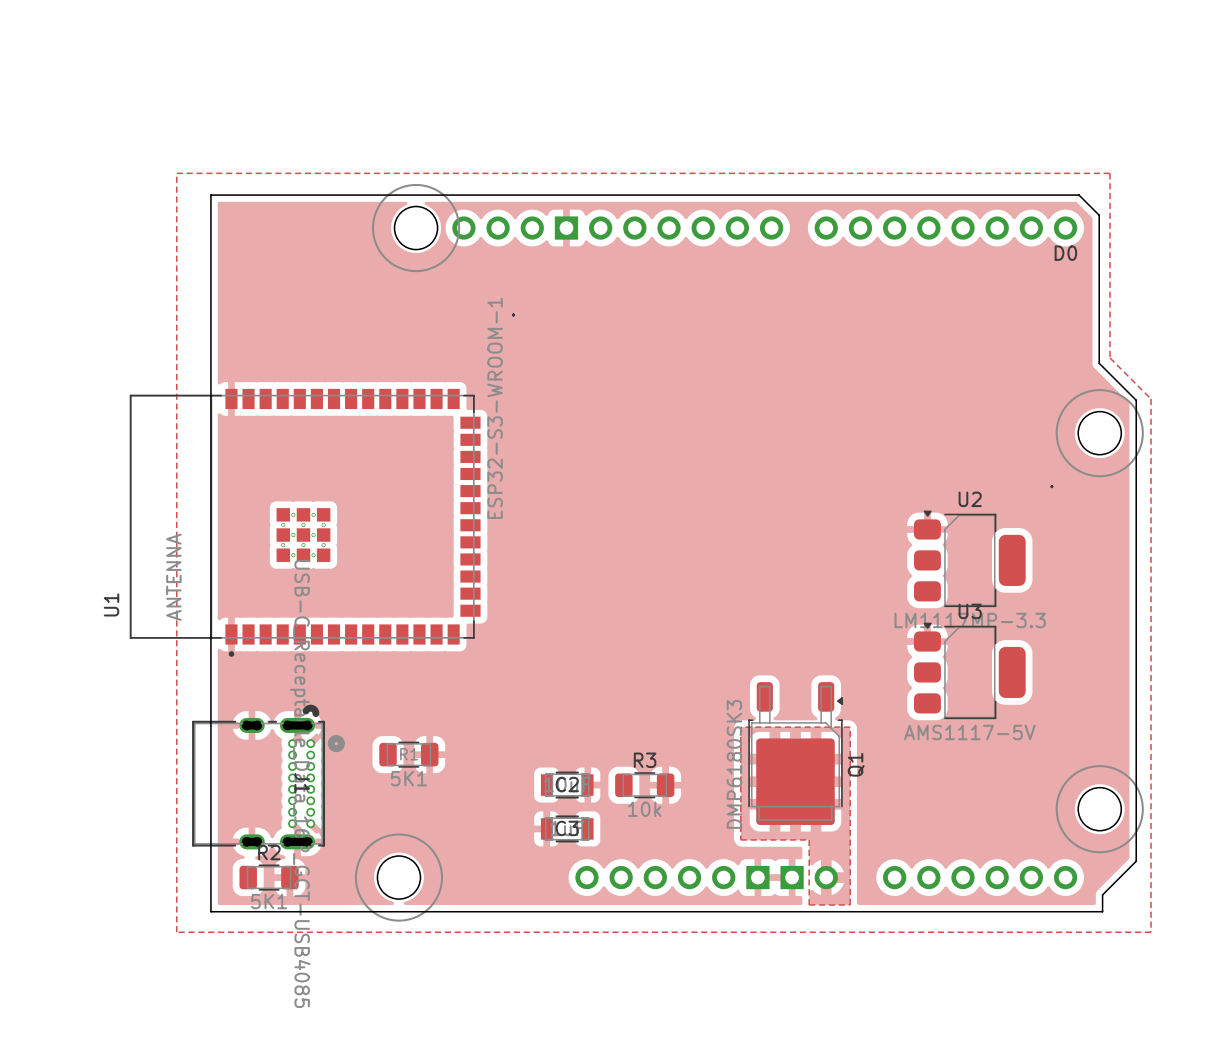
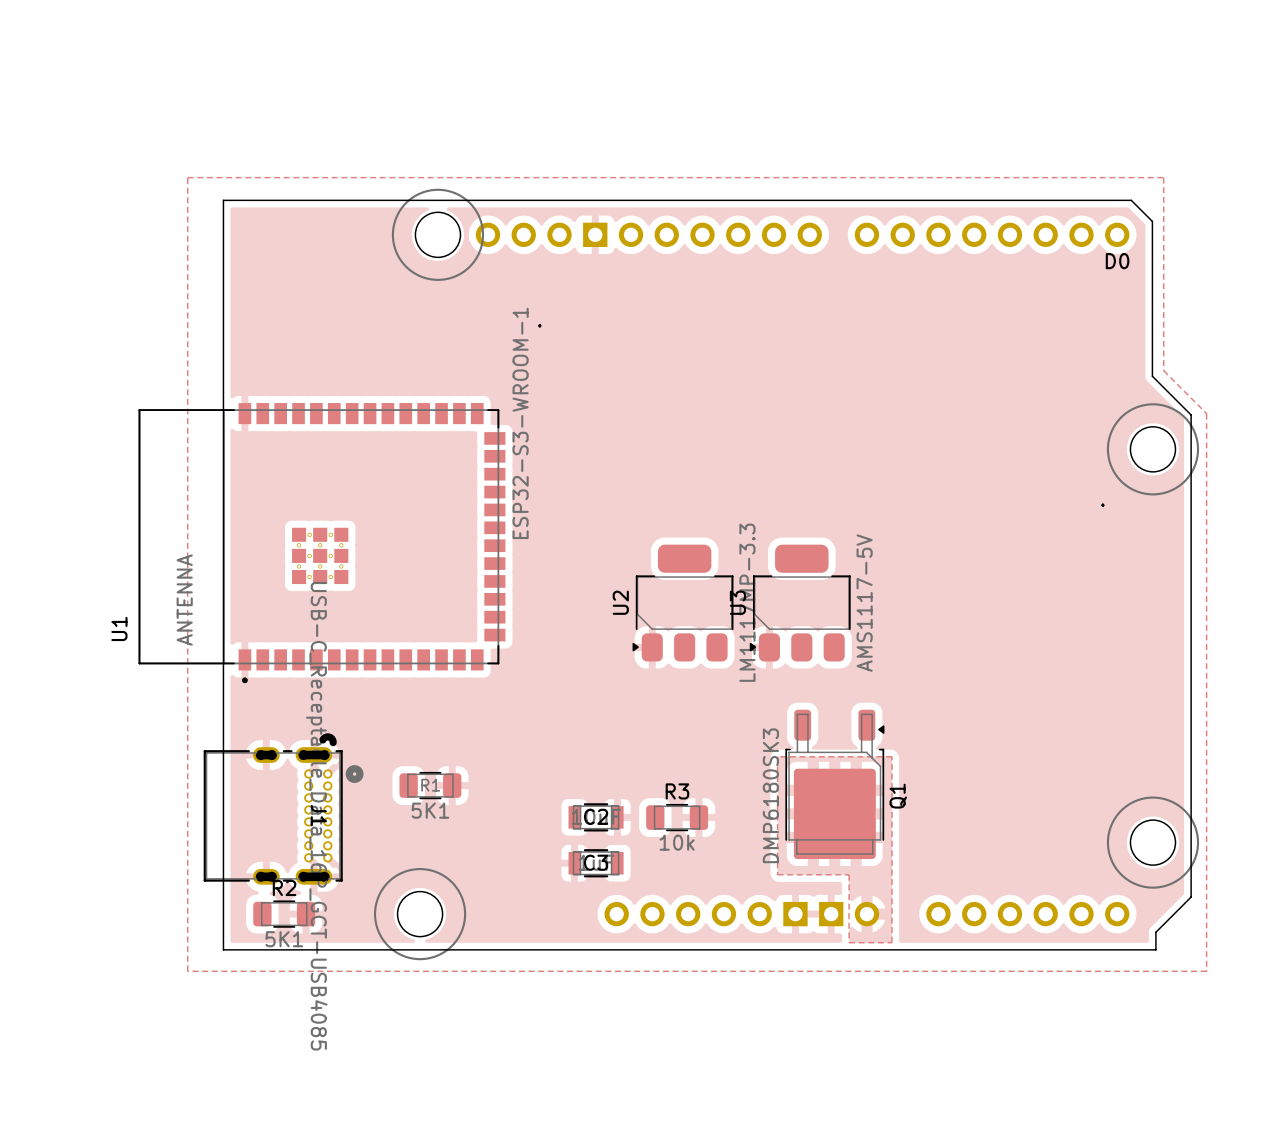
U2 rotation: 0° (969, 558) -> 90° counterclockwise (683, 603)
U2 position: (969, 558) -> (683, 603)
U3 rotation: 0° (969, 670) -> 90° counterclockwise (800, 603)
U3 position: (969, 670) -> (800, 603)

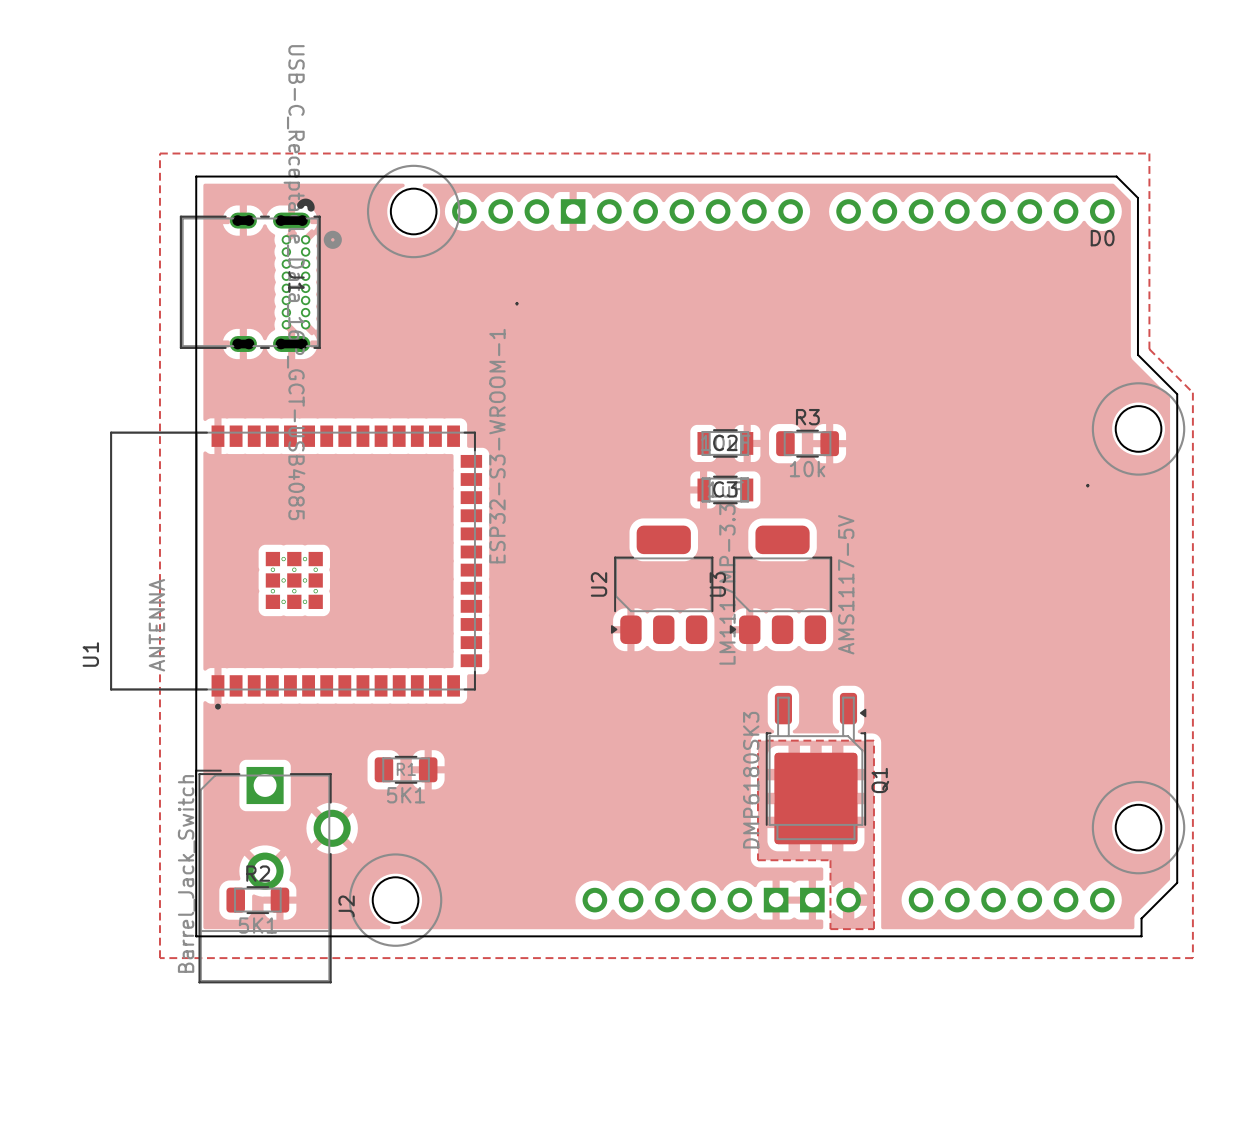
U1 position: (322, 543) -> (296, 567)
J1 position: (283, 808) -> (260, 275)
C2 position: (596, 817) -> (725, 443)
R3 position: (677, 817) -> (807, 443)
C3 position: (596, 863) -> (725, 489)
J2: none -> Barrel_Jack_Switch (272, 875)

